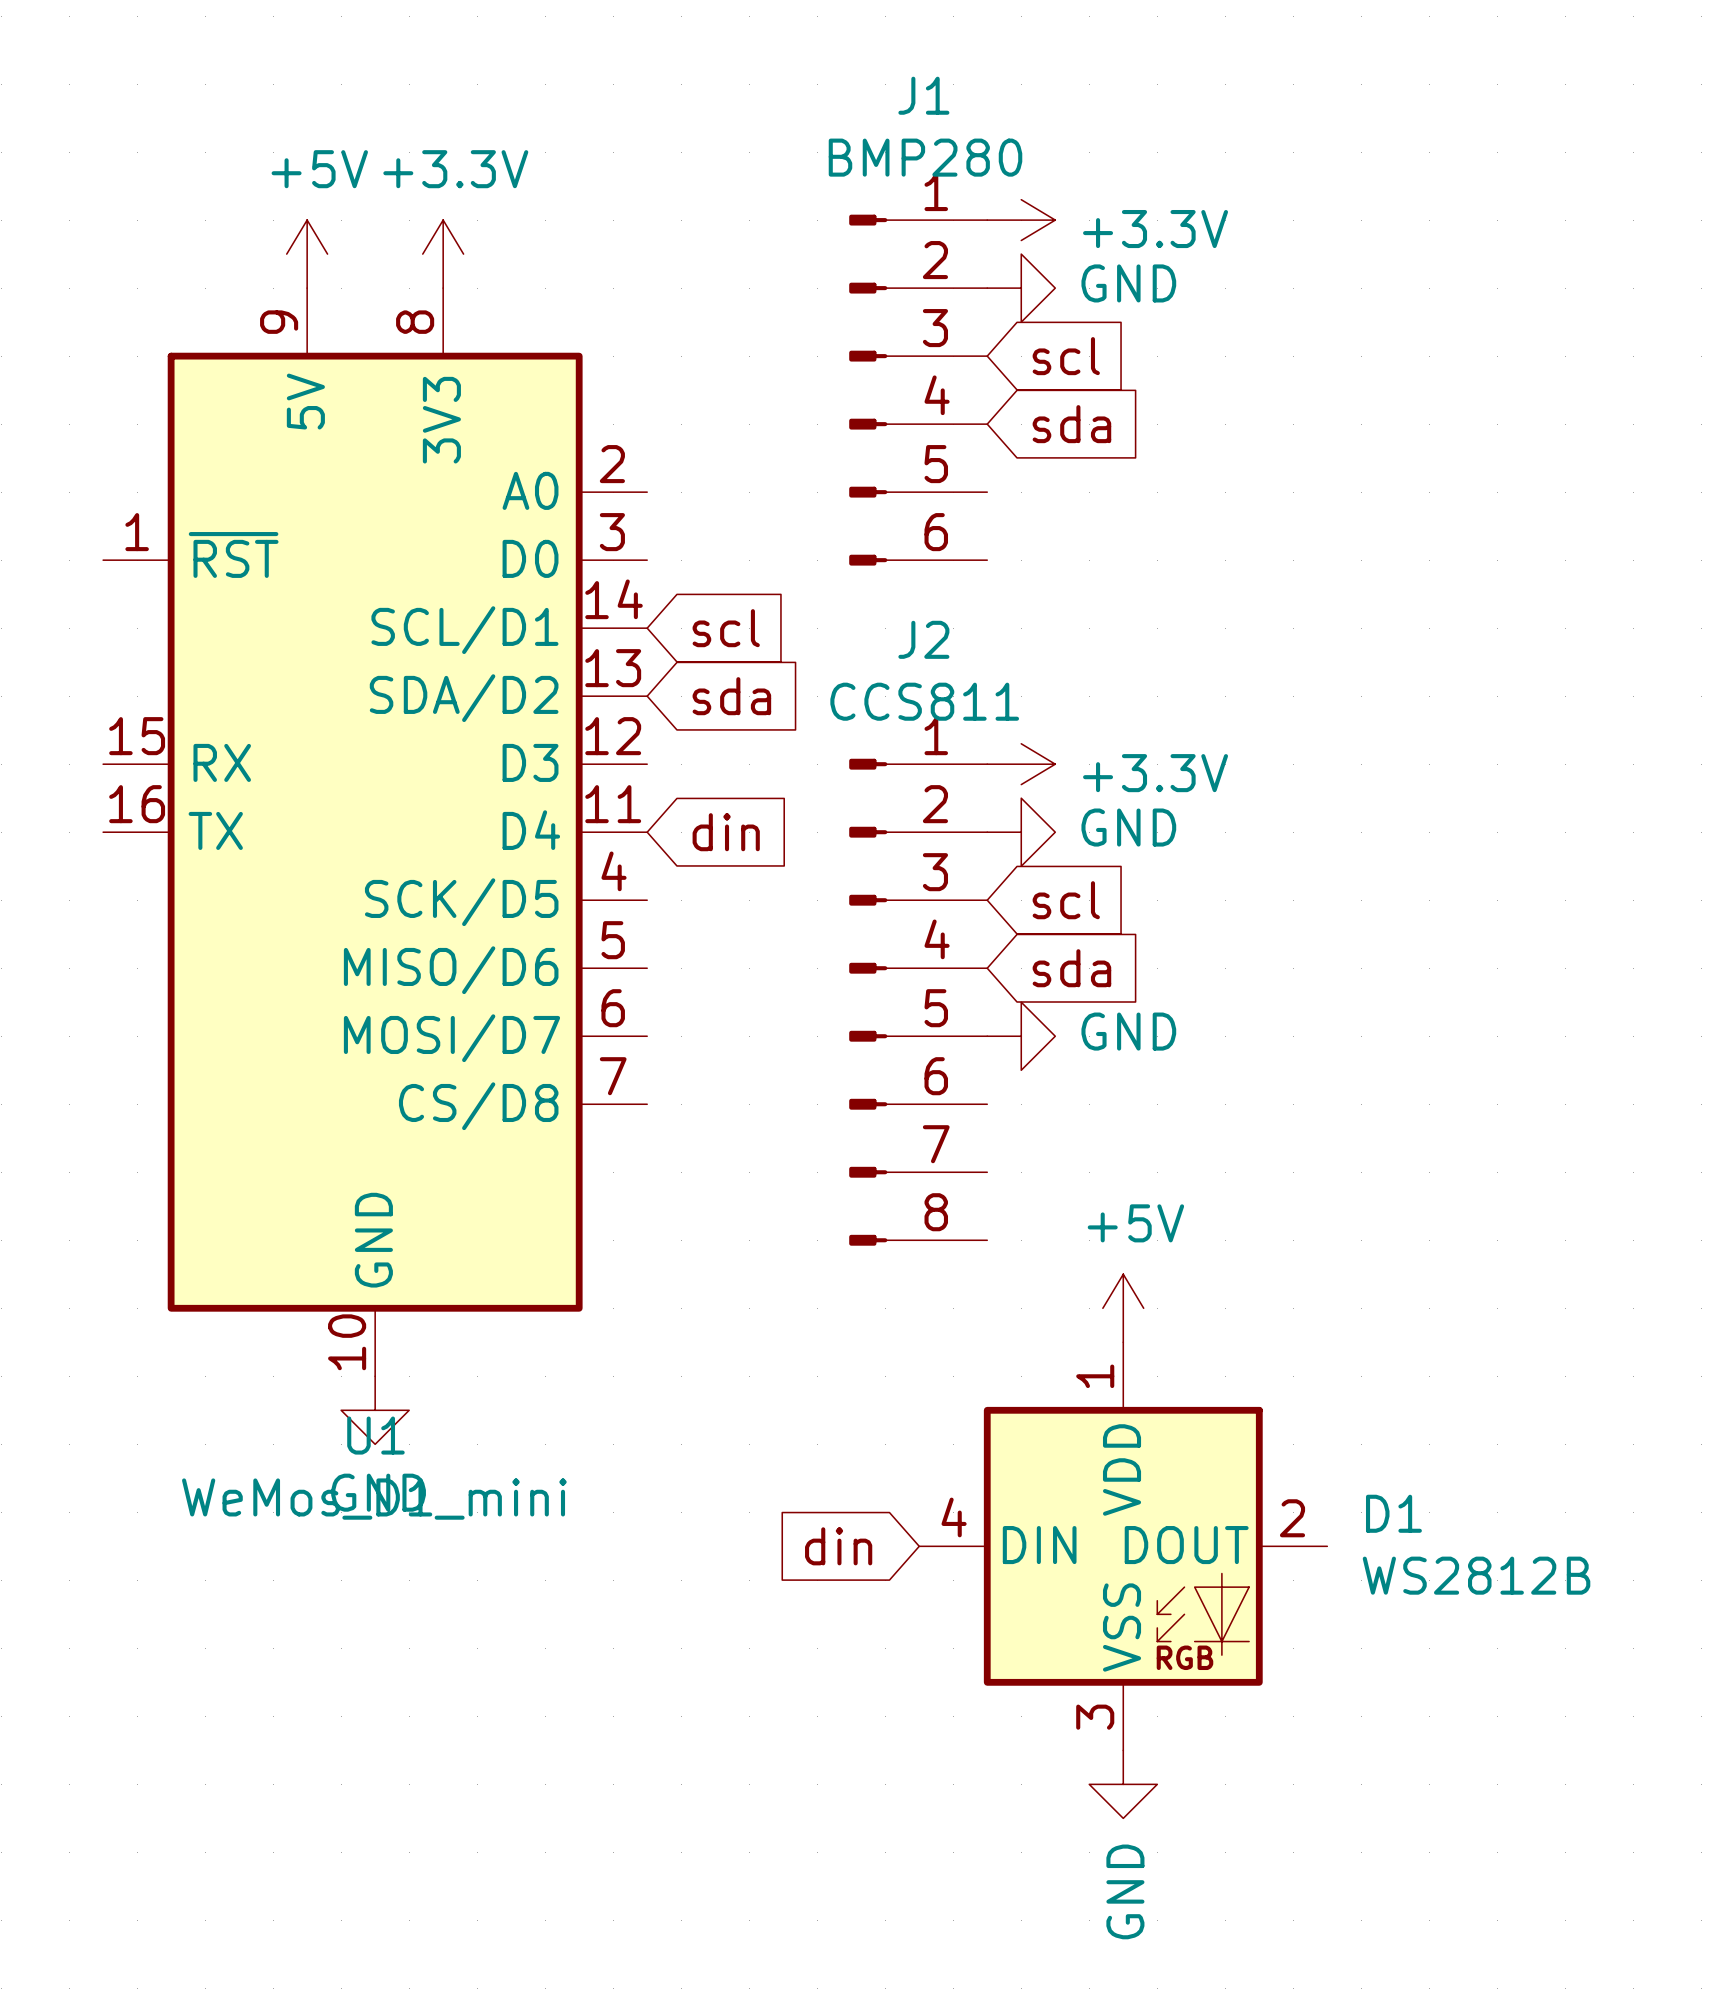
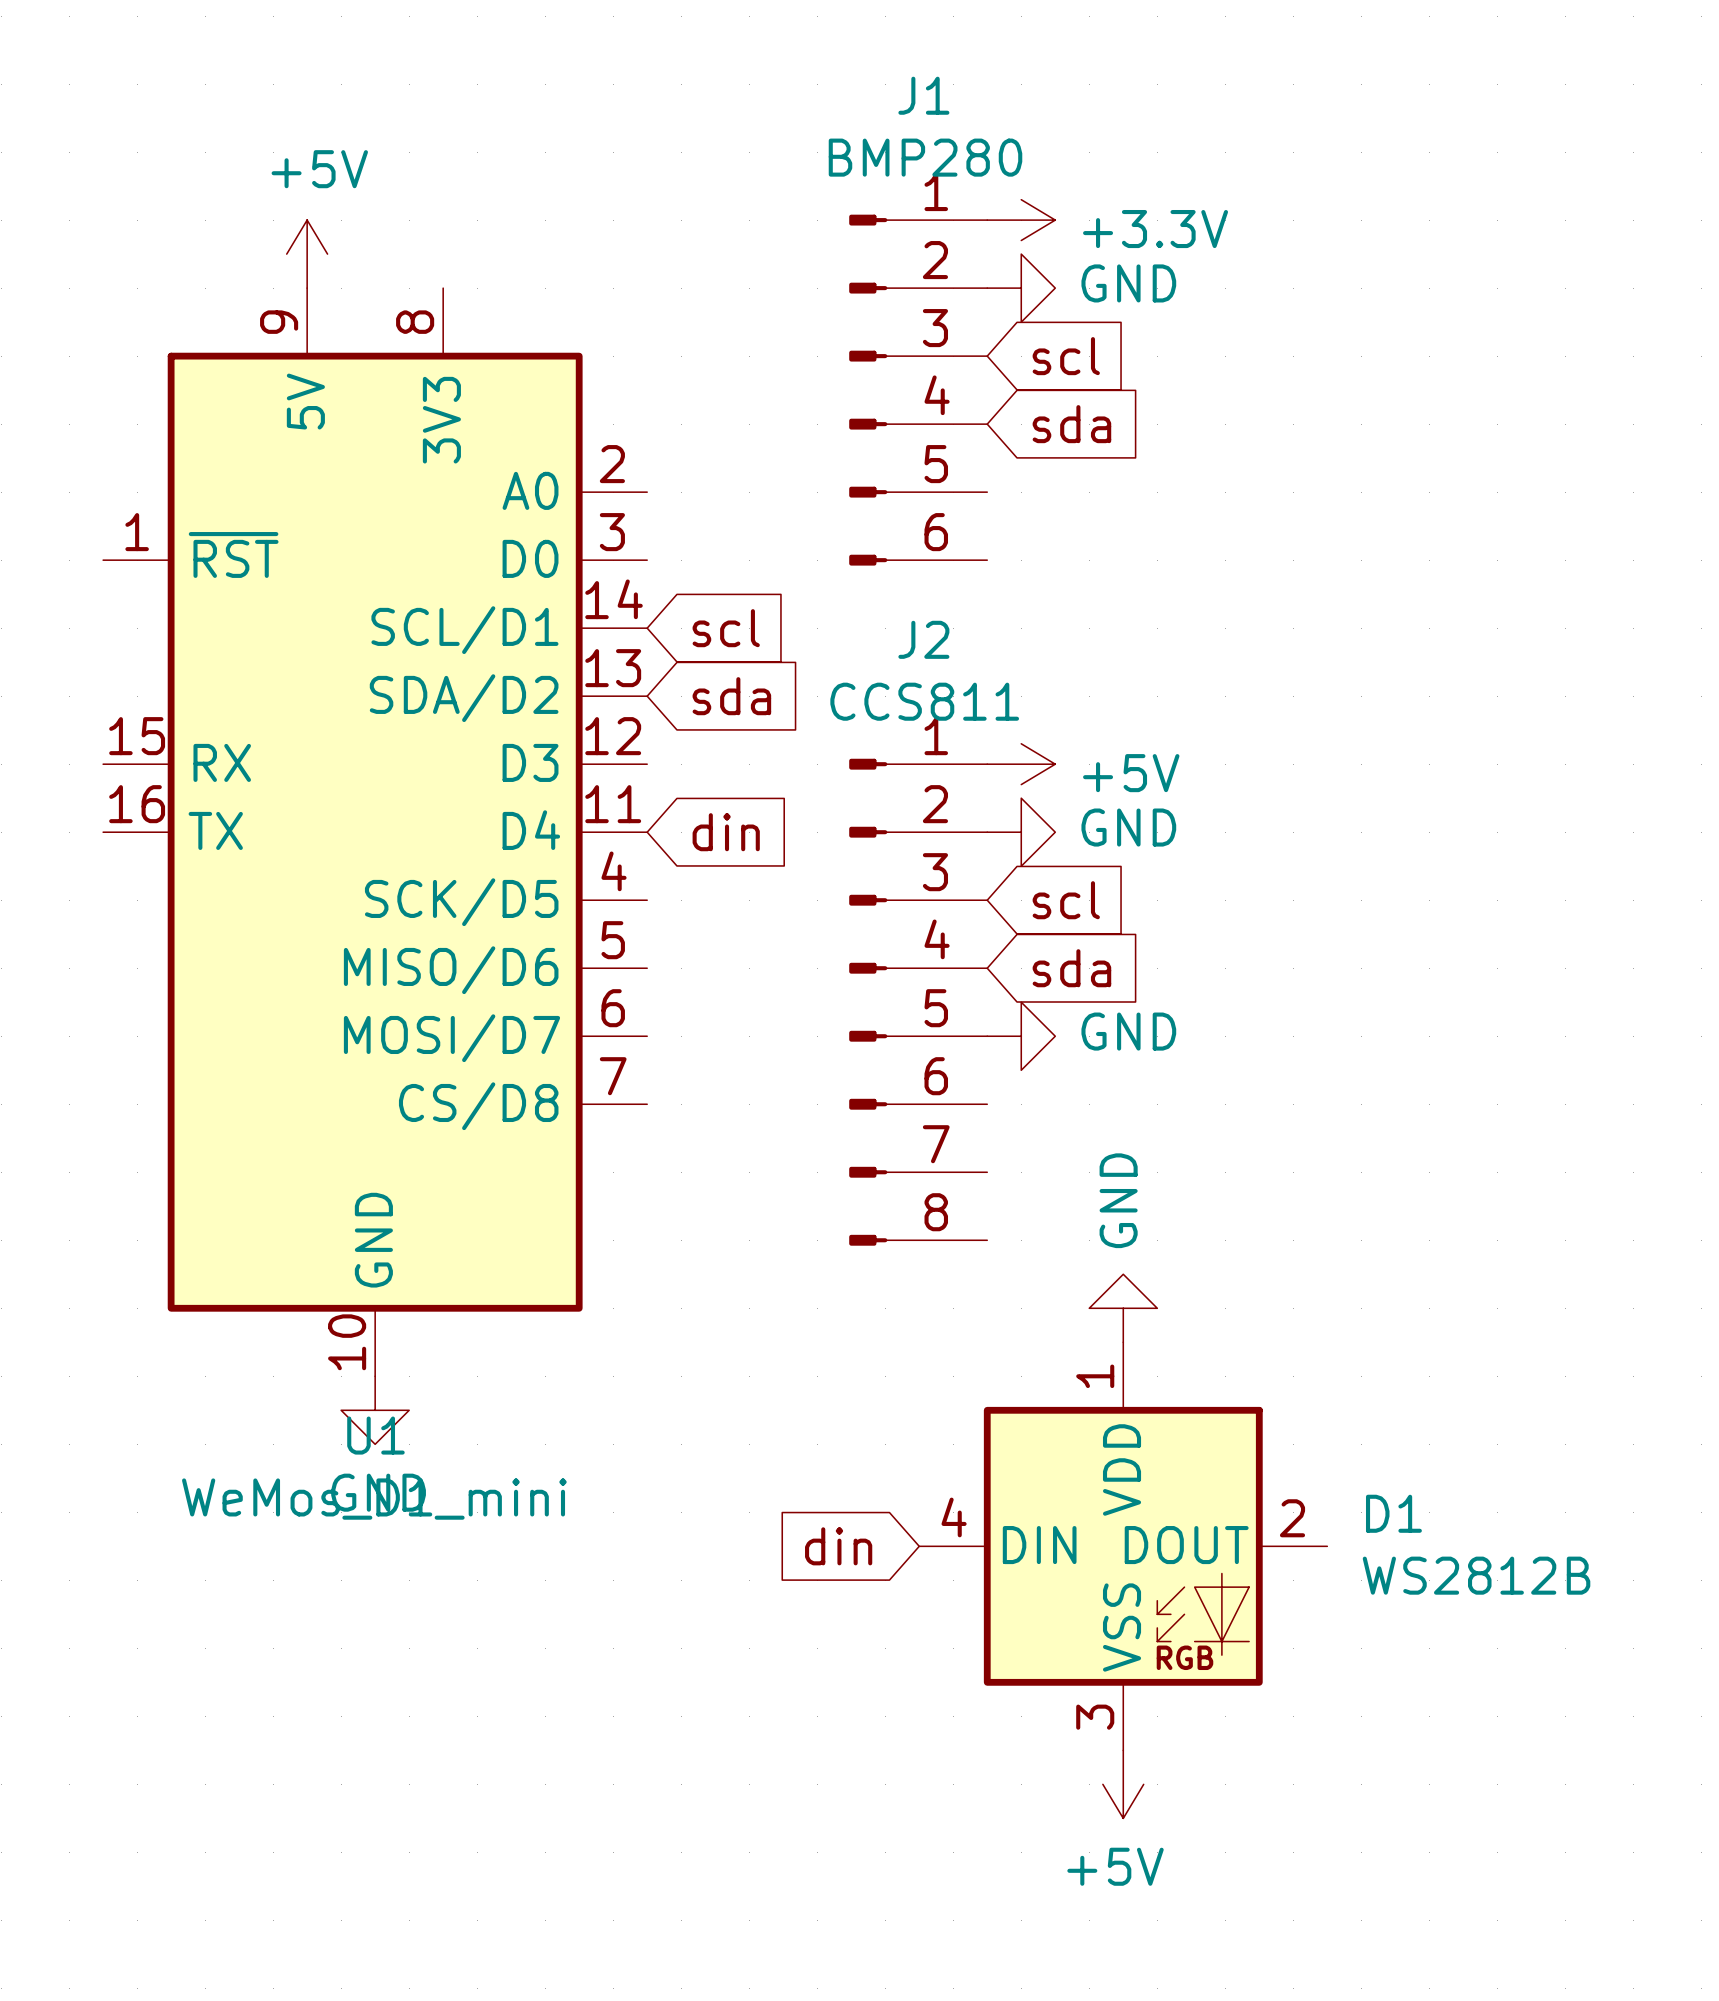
power symbol: +3.3V (443, 254) -> none
power symbol: +3.3V (1021, 764) -> +5V (1021, 764)
power symbol: +5V (1123, 1308) -> GND (1123, 1308)
power symbol: GND (1123, 1784) -> +5V (1123, 1784)

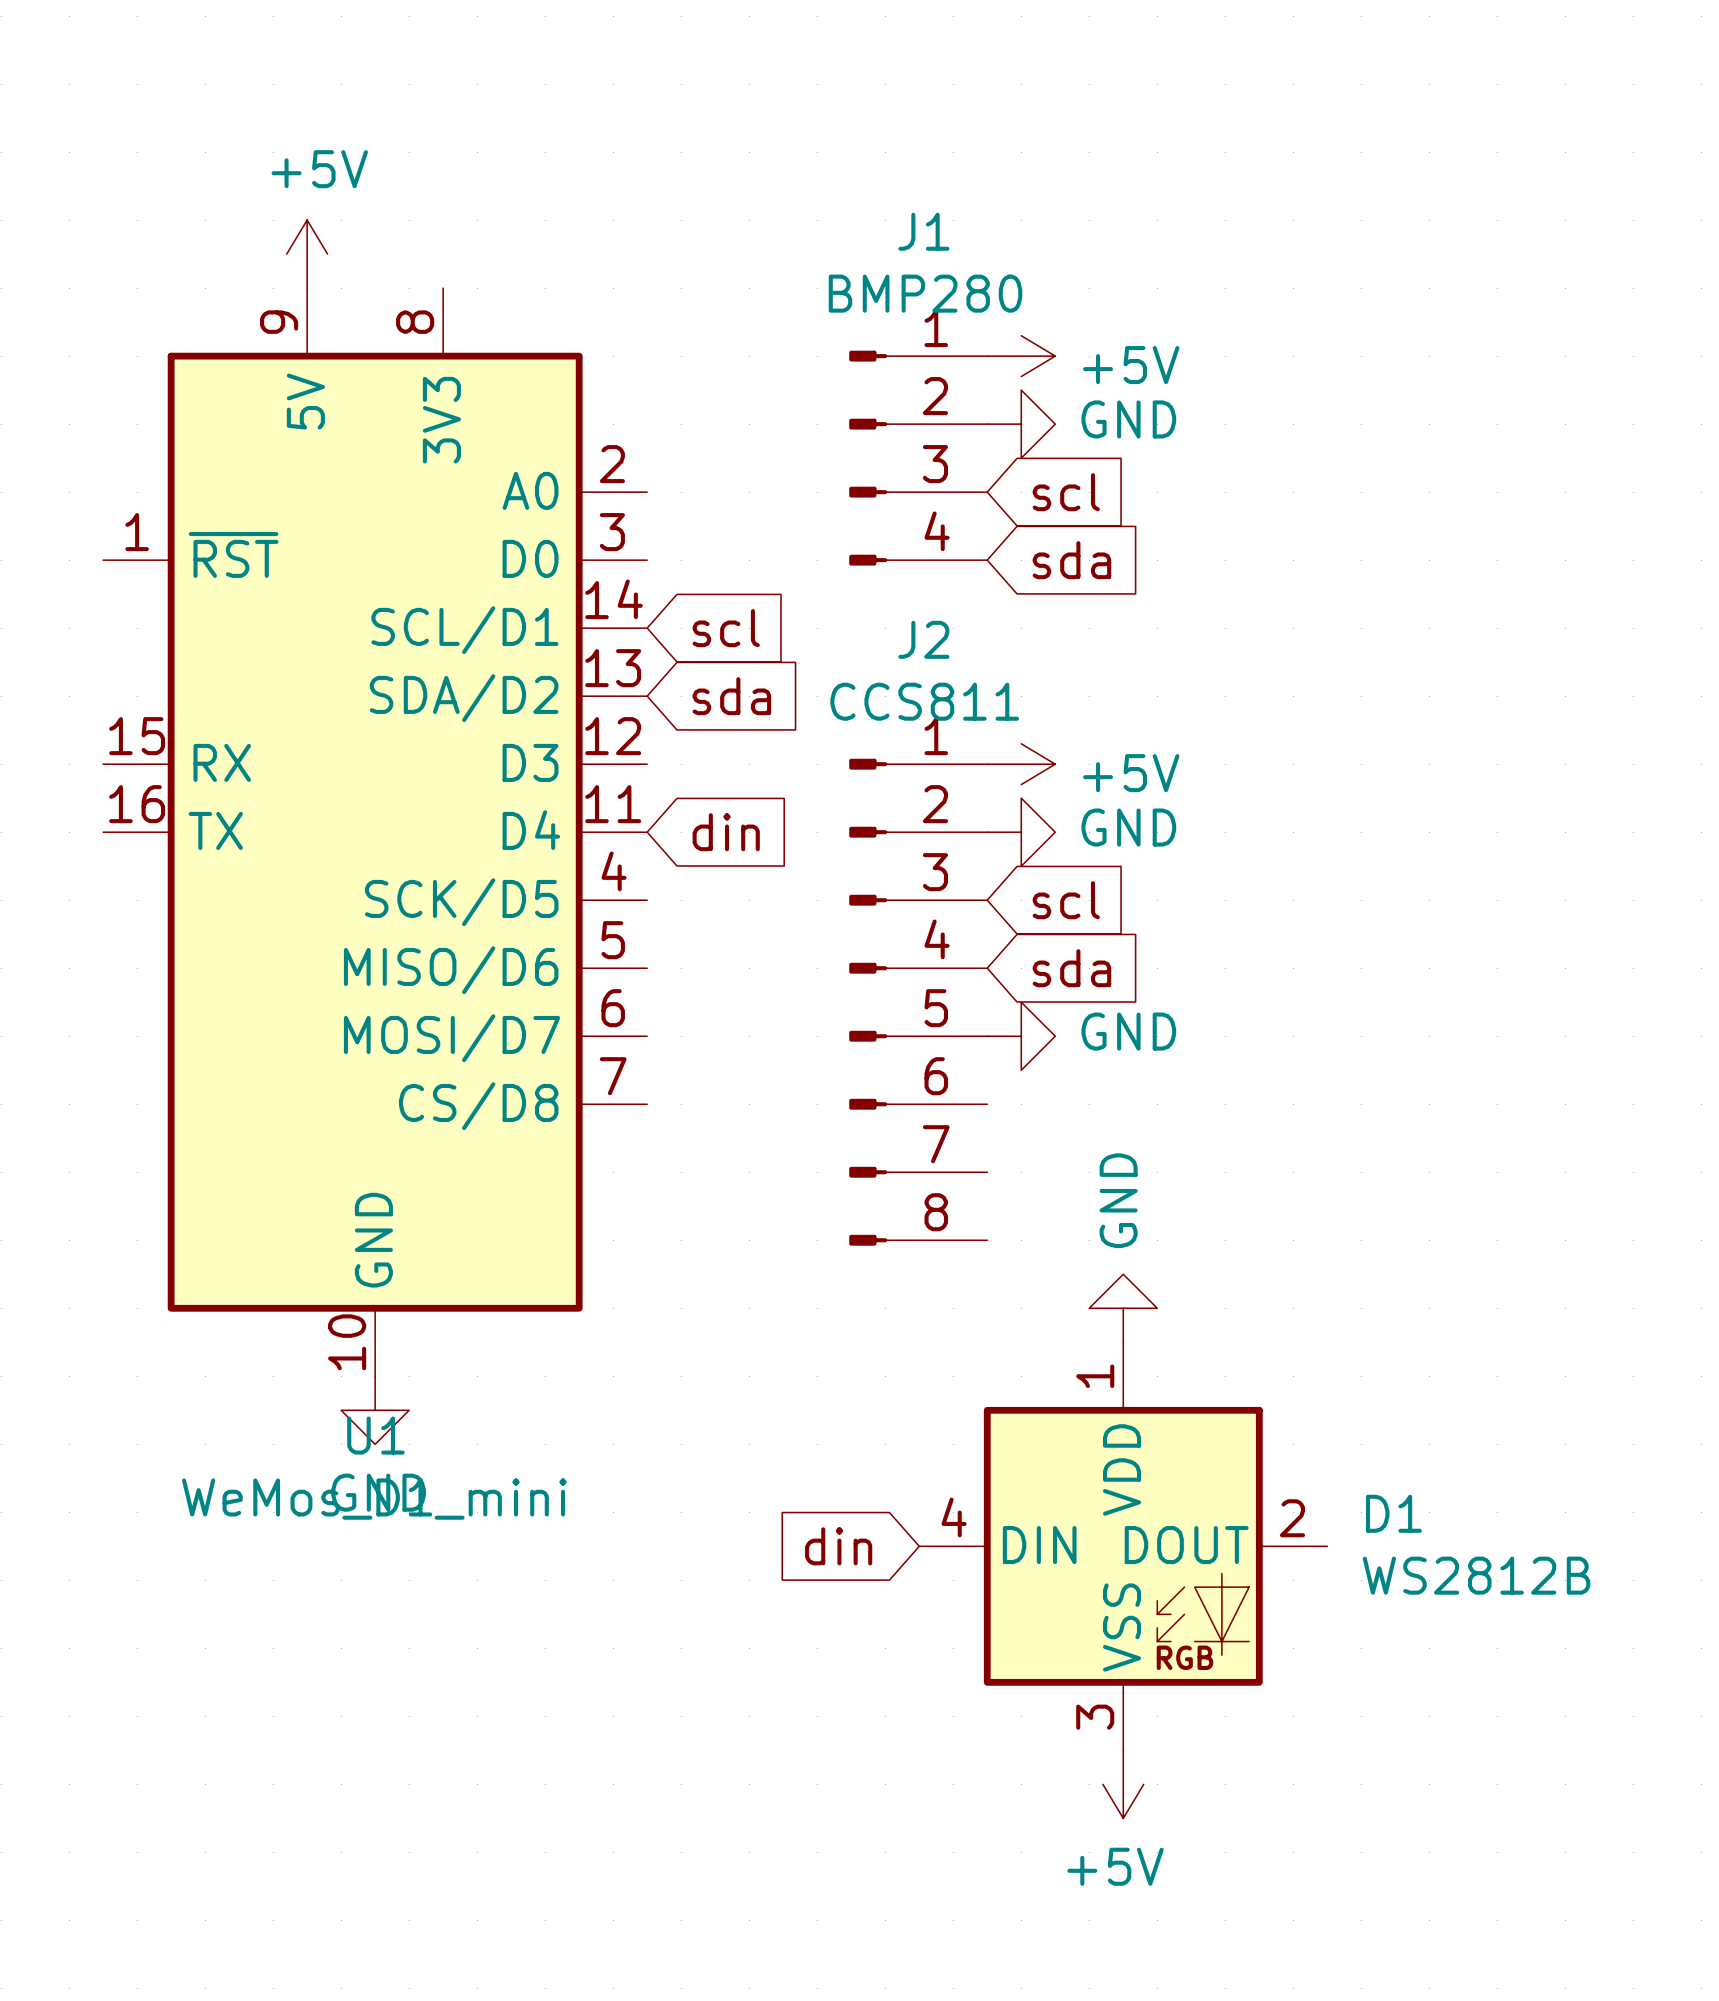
J1 name position: J1 (923, 95) -> J1 (923, 231)
J1 value position: BMP280 (925, 157) -> BMP280 (925, 293)
J1 symbol: [849, 214, 988, 566] -> [849, 350, 988, 566]
power symbol: +3.3V (1021, 220) -> none
power symbol position: GND (1021, 288) -> GND (1021, 424)
power symbol: none -> +5V (1021, 356)
global label position: scl (1066, 356) -> scl (1066, 492)
global label position: sda (1071, 424) -> sda (1071, 560)

